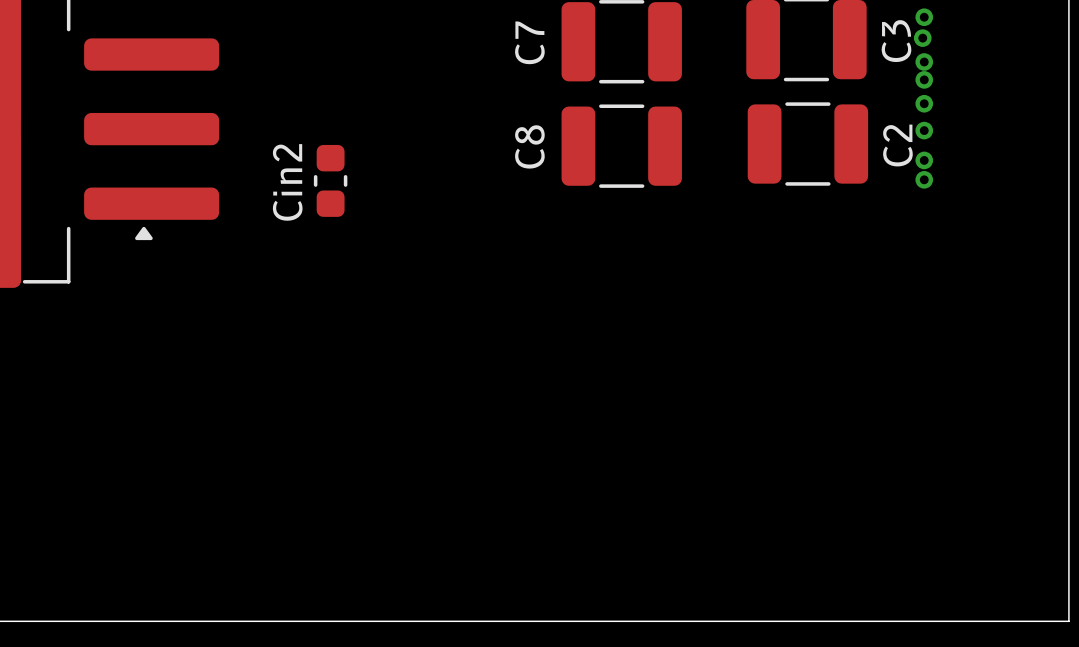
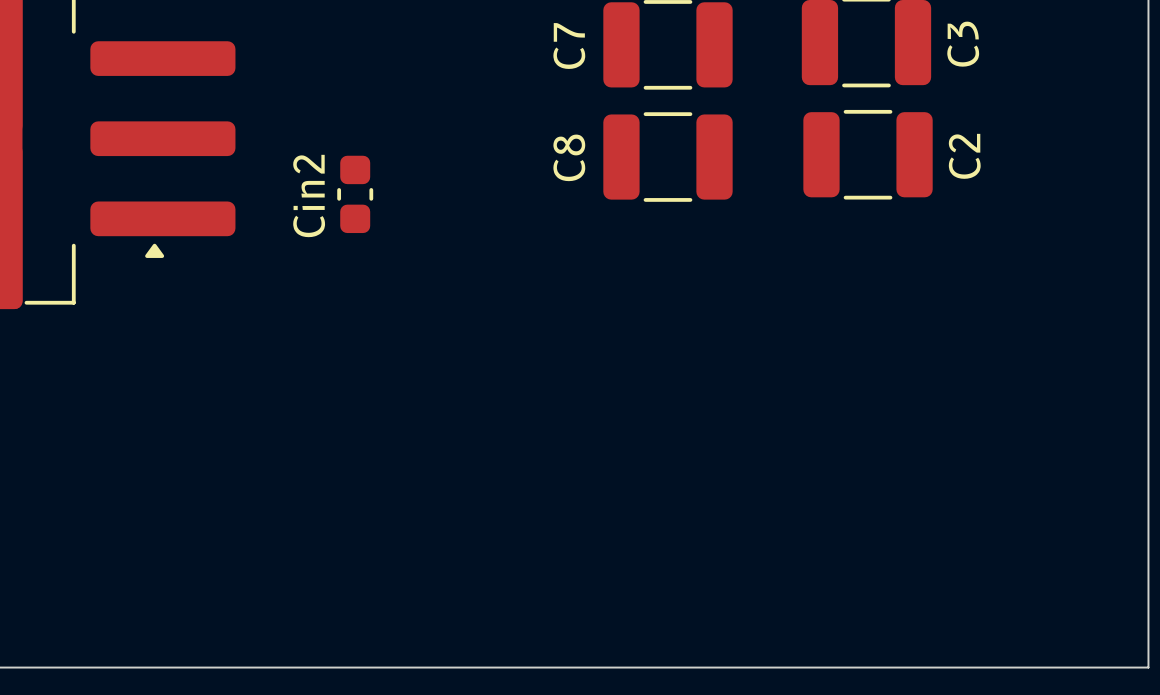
via: (924, 17) -> none
via: (922, 38) -> none
via: (924, 61) -> none
via: (924, 79) -> none
via: (924, 103) -> none
via: (924, 130) -> none
via: (924, 160) -> none
via: (924, 179) -> none

